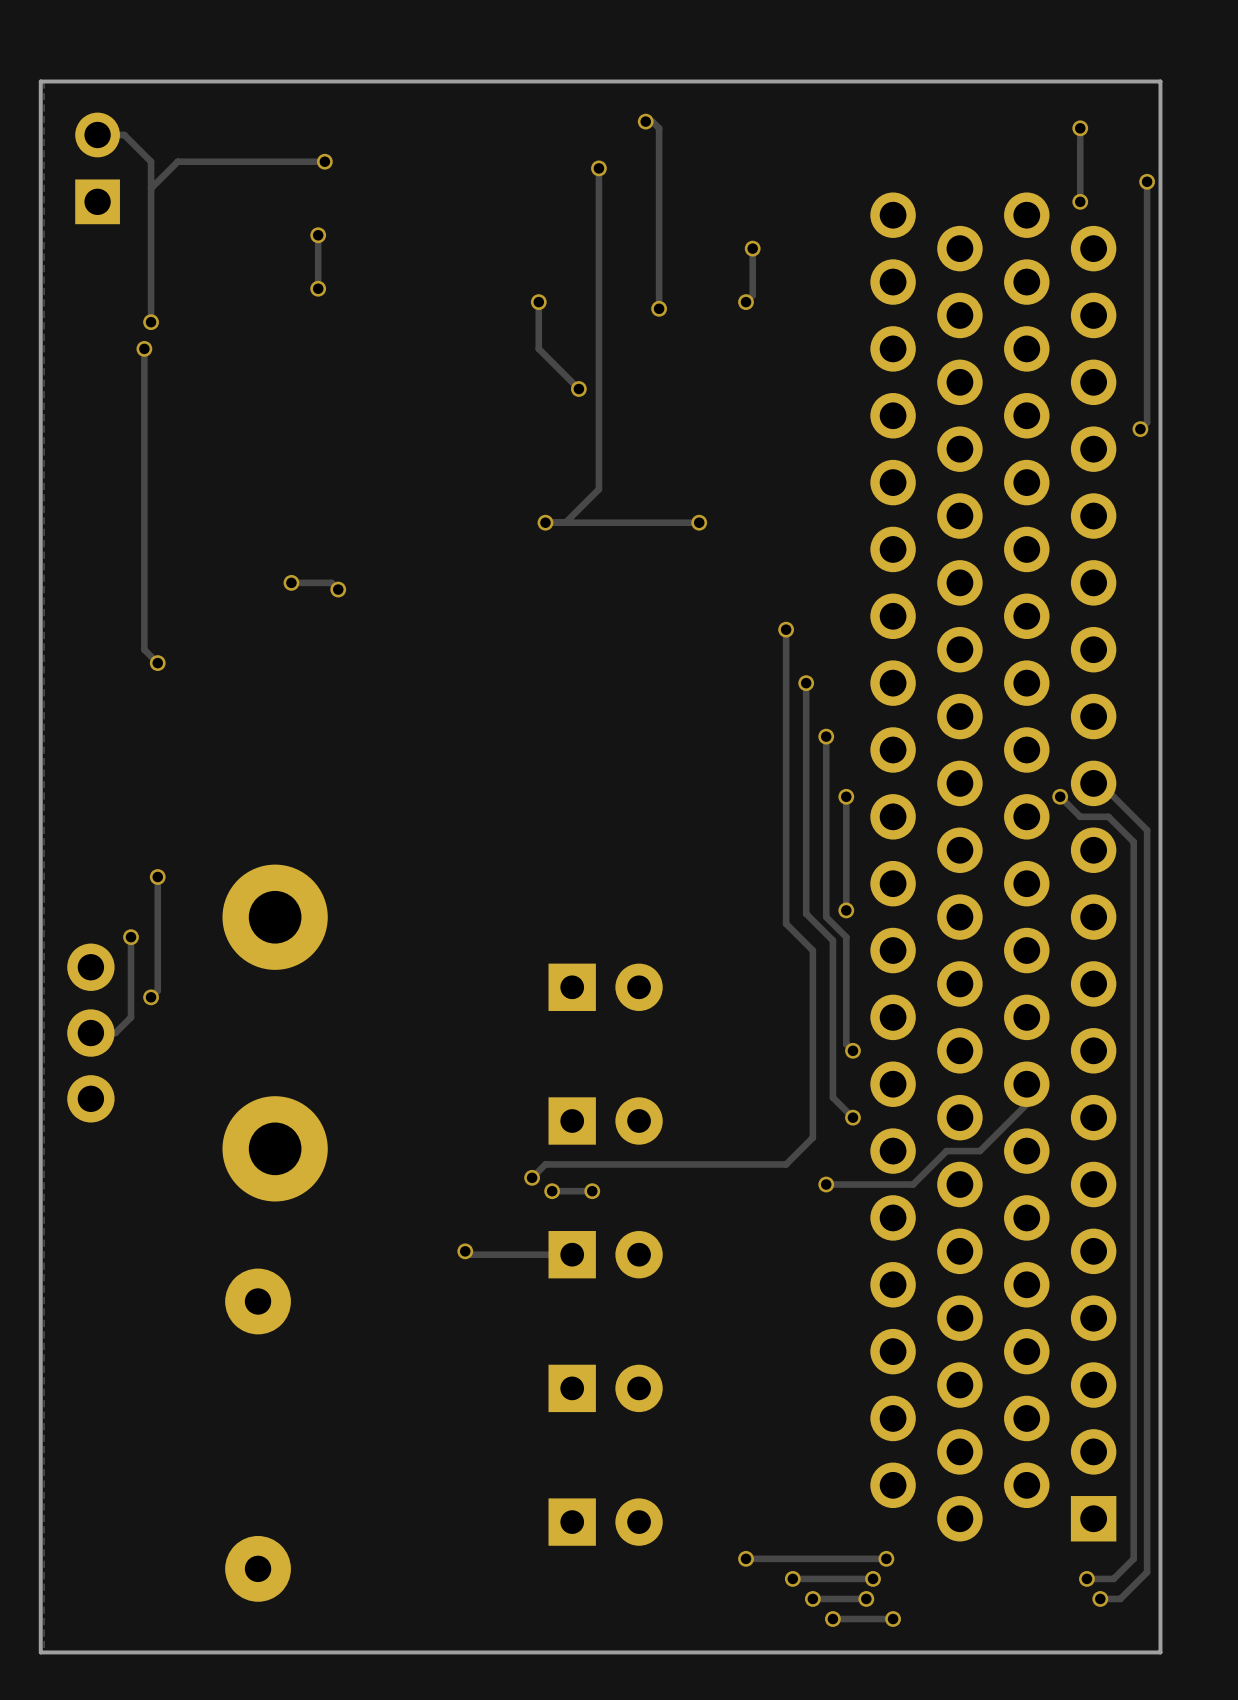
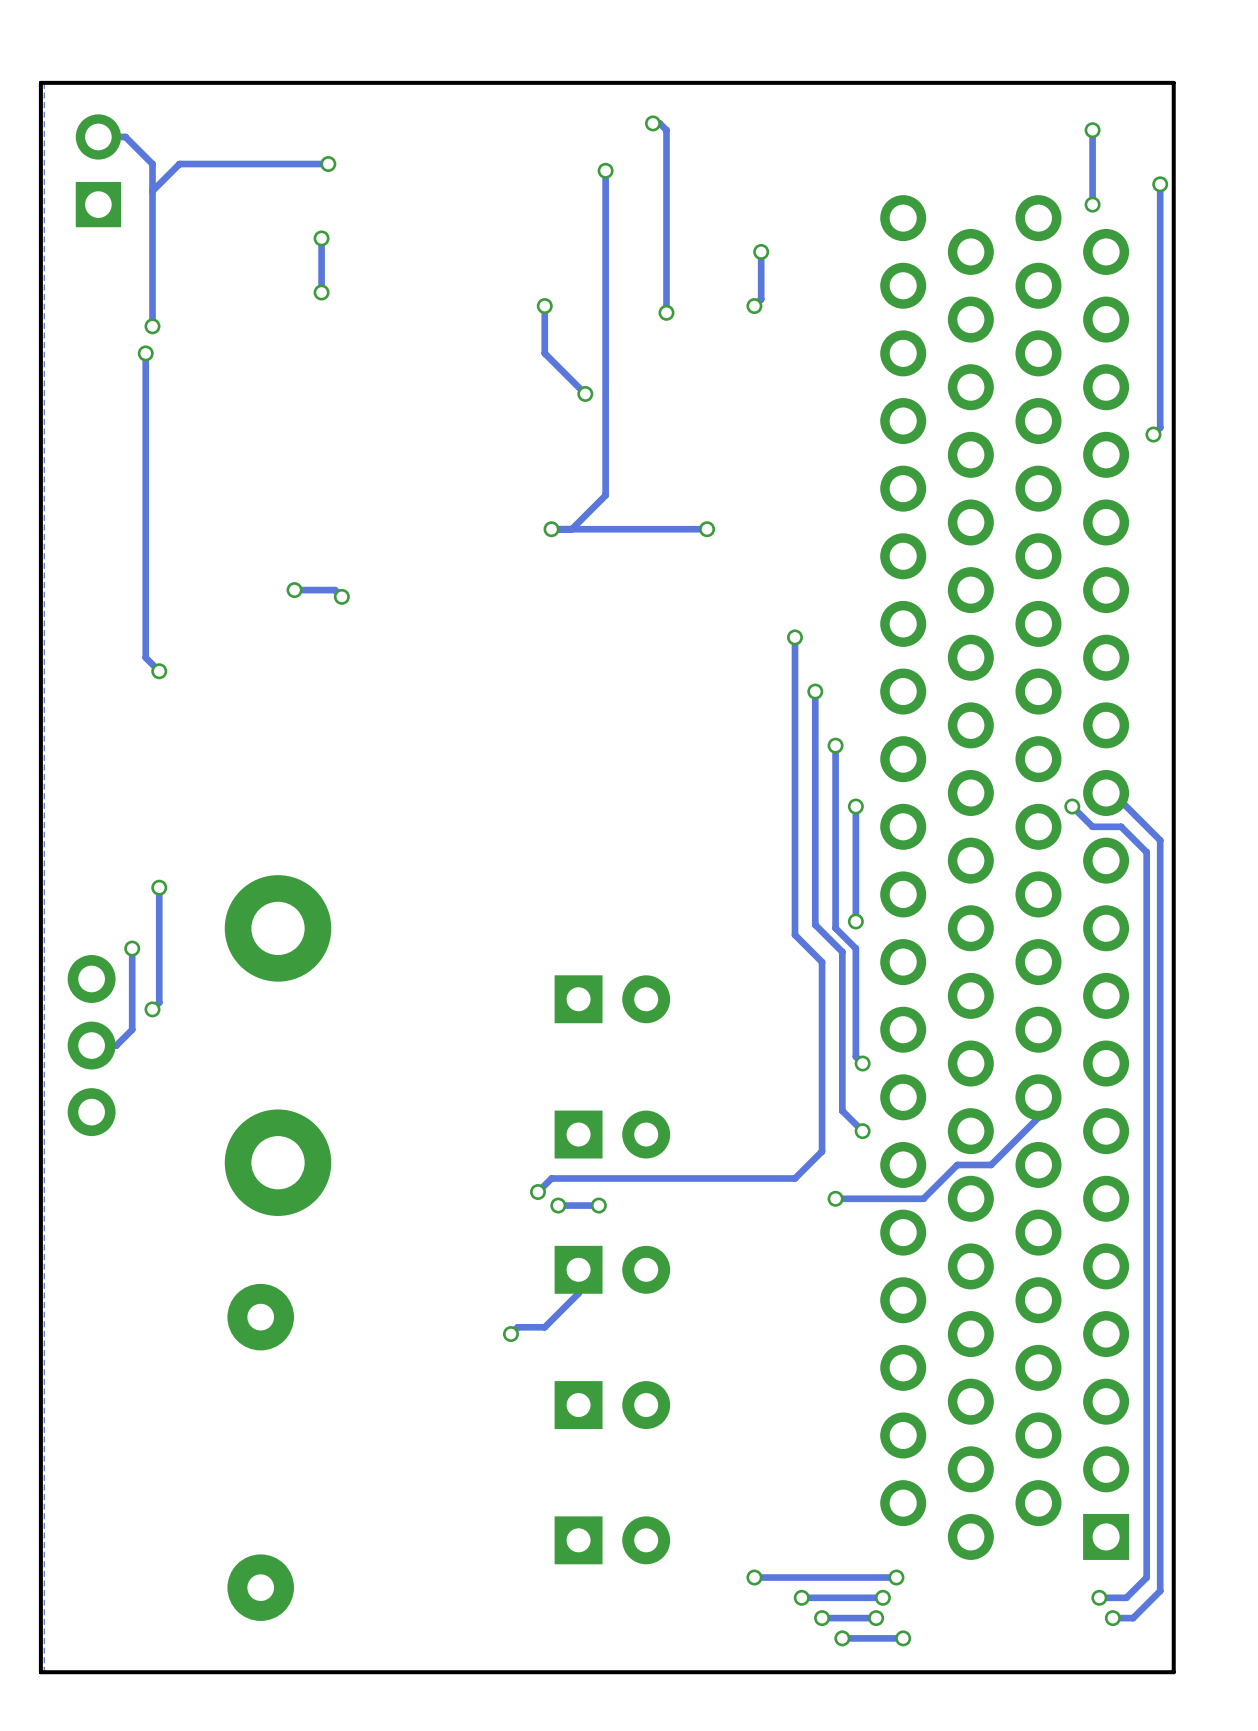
track: (465, 1251) (468, 1254) (572, 1254) -> (510, 1334) (517, 1327) (544, 1327) (578, 1293) (578, 1269)
via position: (465, 1251) -> (510, 1334)

